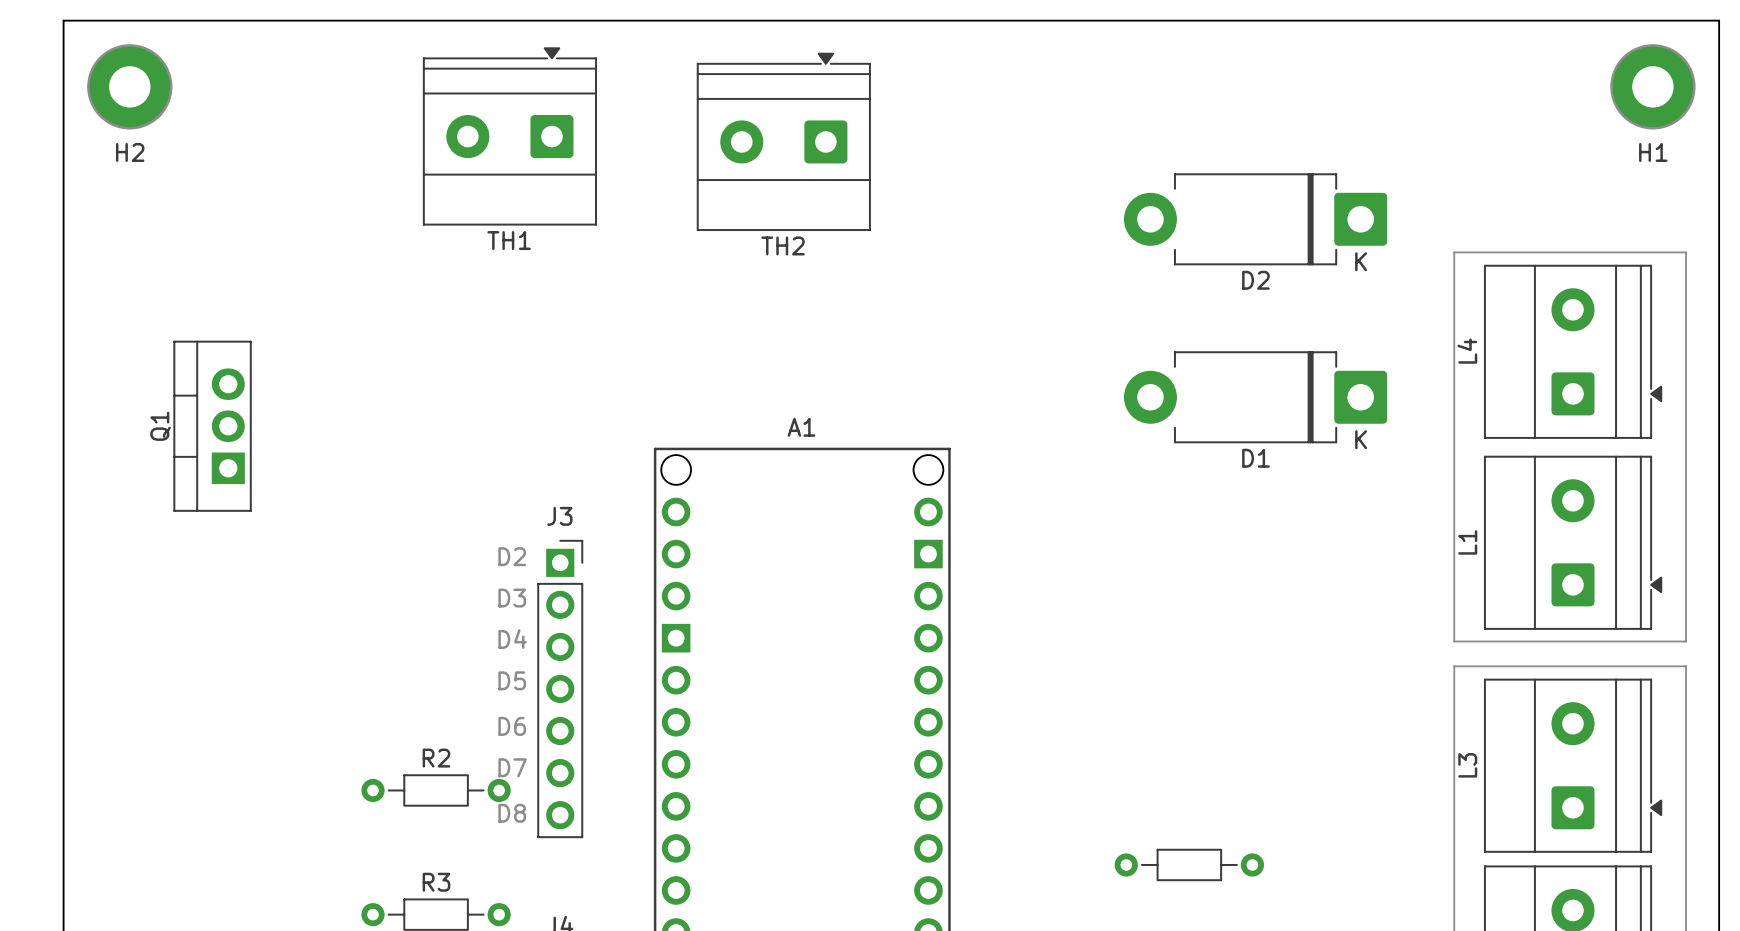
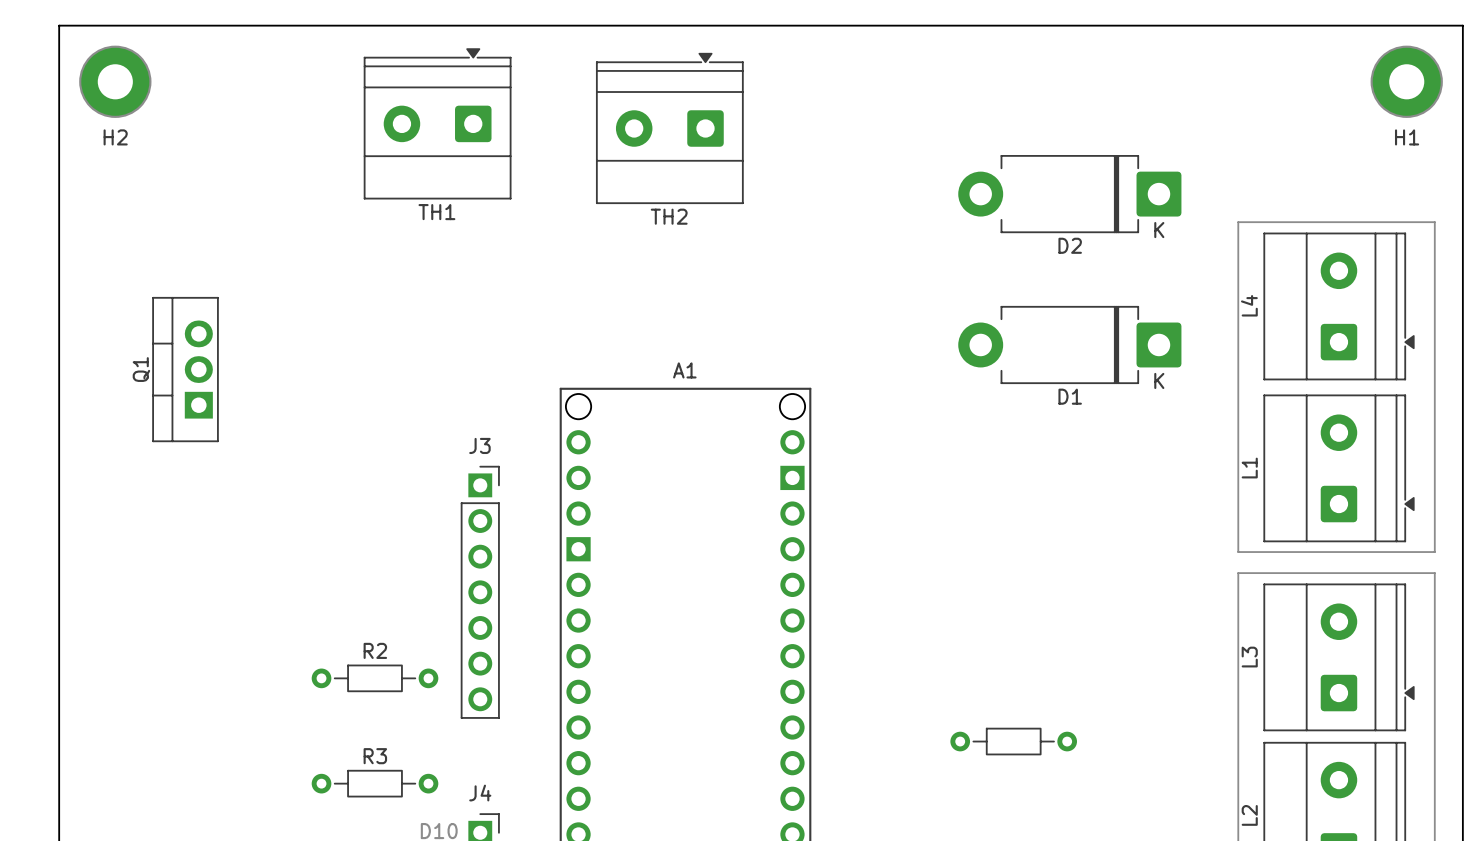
text: D2 (512, 556) -> none
text: D3 (512, 598) -> none
text: D4 (512, 639) -> none
text: D5 (512, 680) -> none
text: D6 (512, 726) -> none
text: D7 (512, 767) -> none
text: D8 (512, 813) -> none

